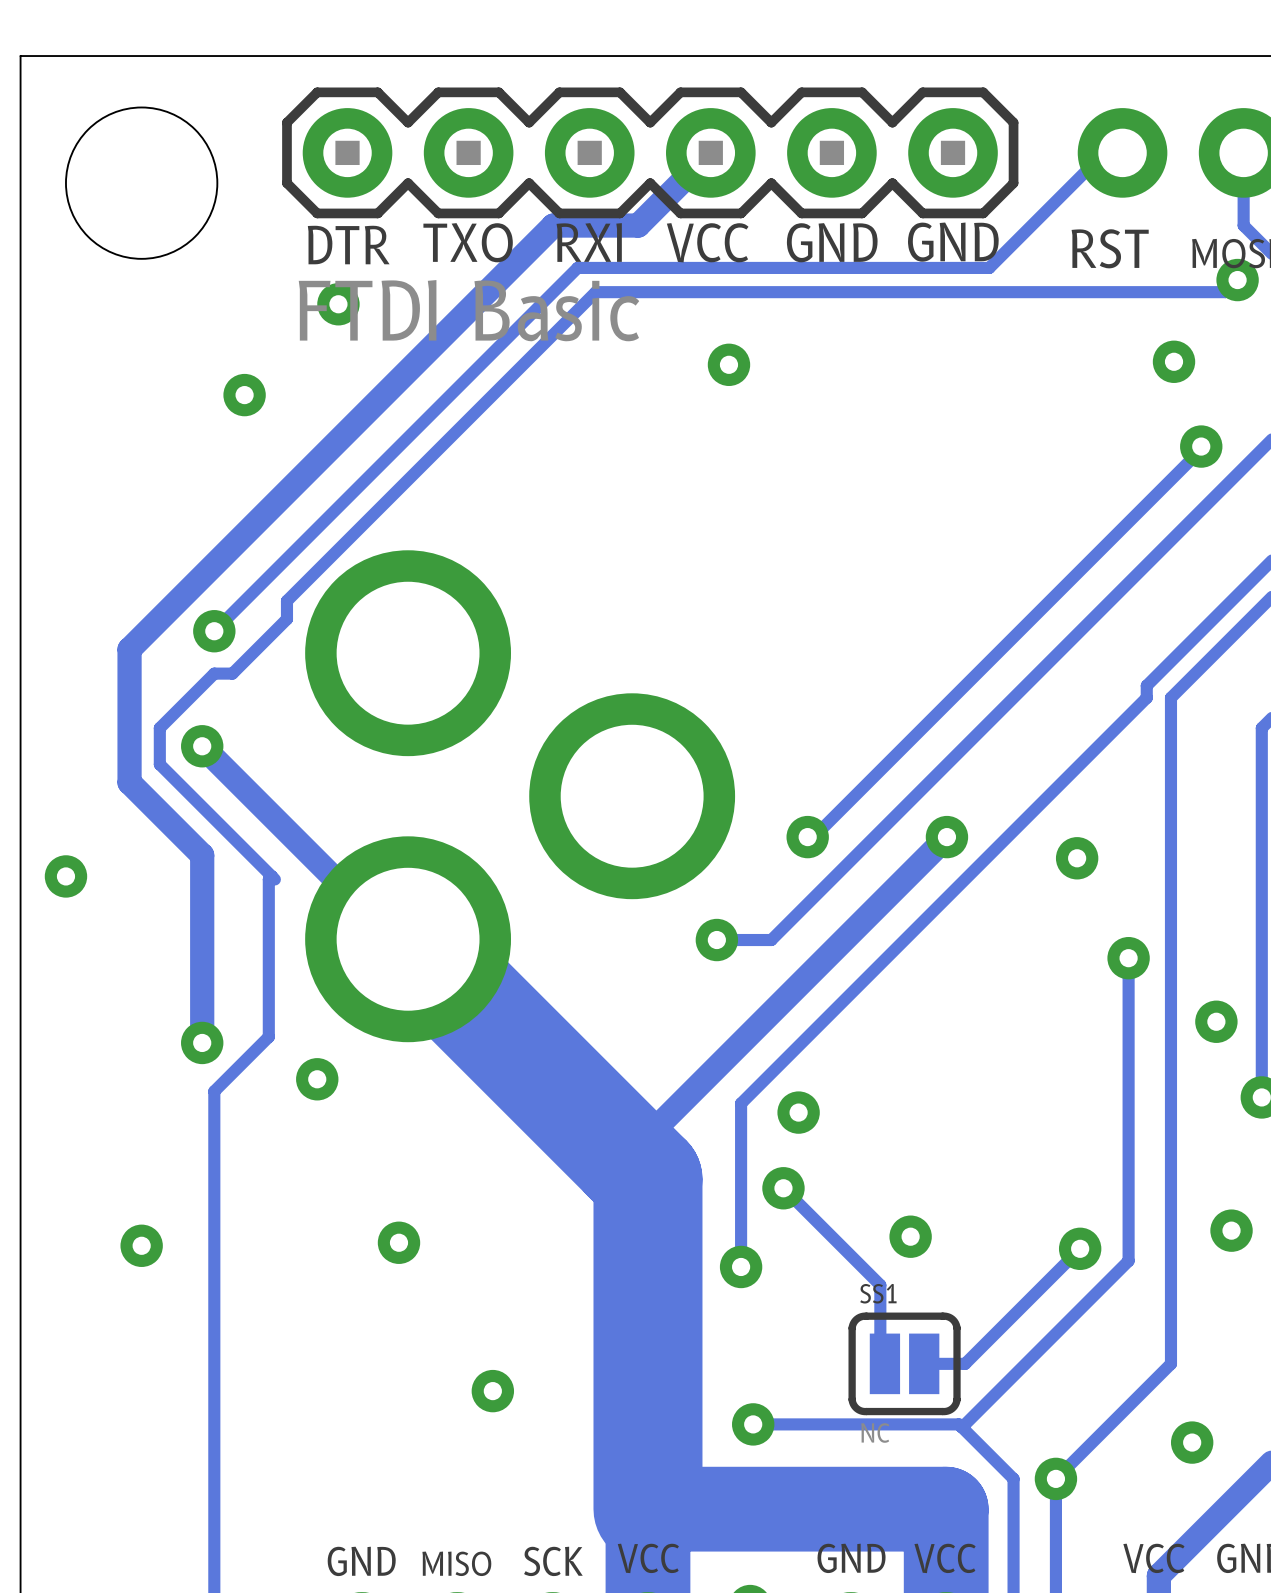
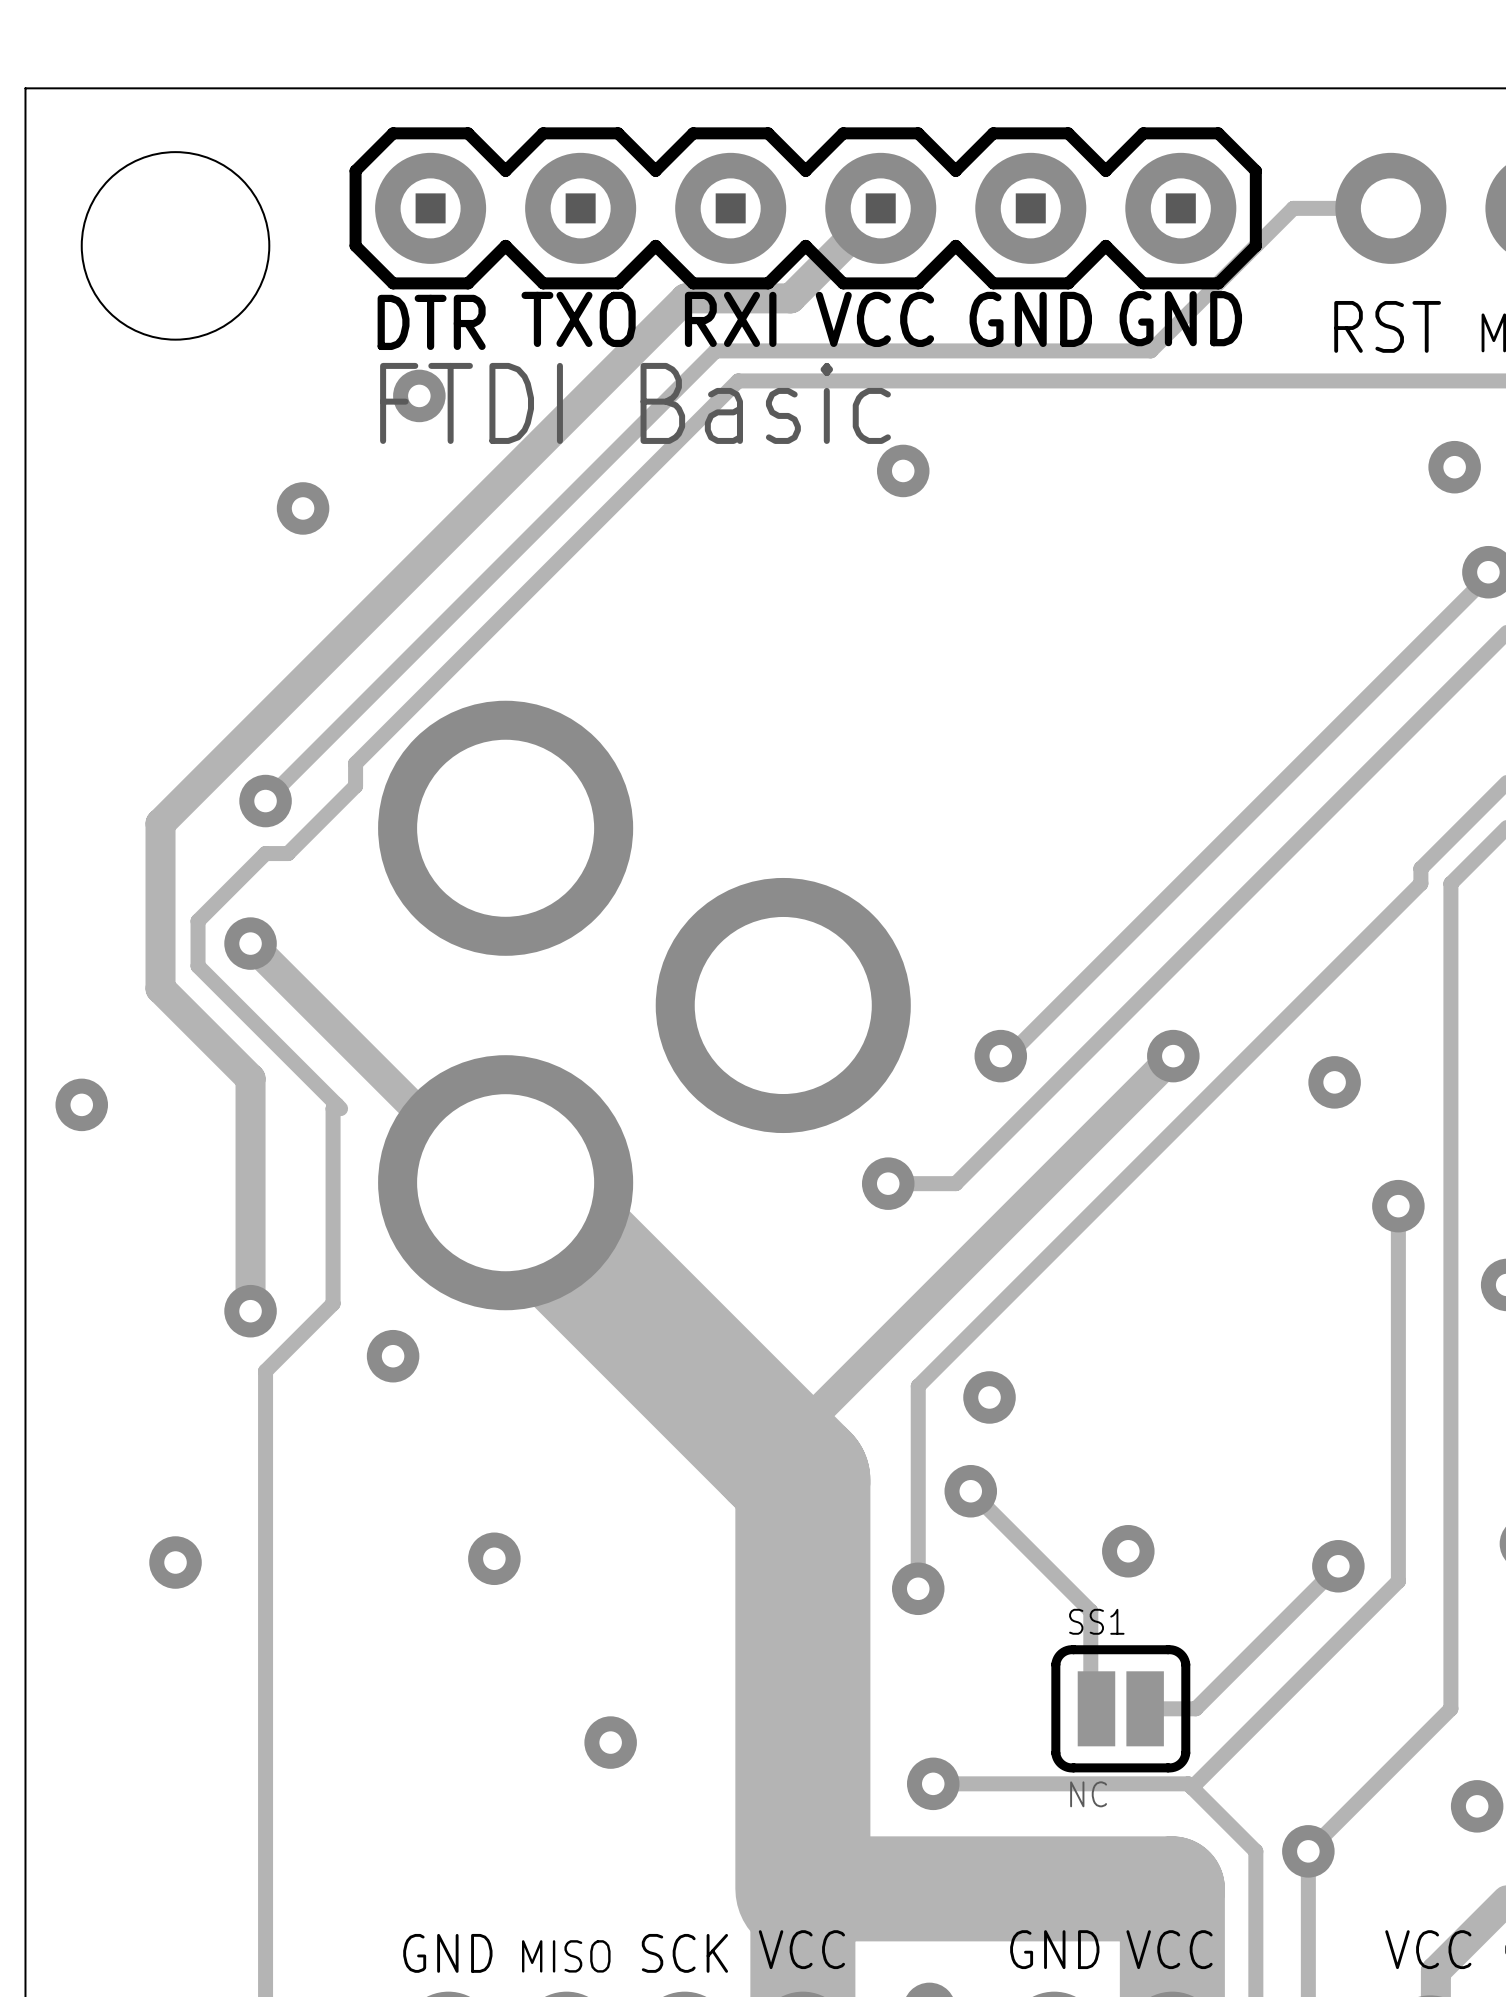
track: (1104, 152) (989, 267) (928, 267) -> (1368, 208) (1293, 208) (1150, 350)

